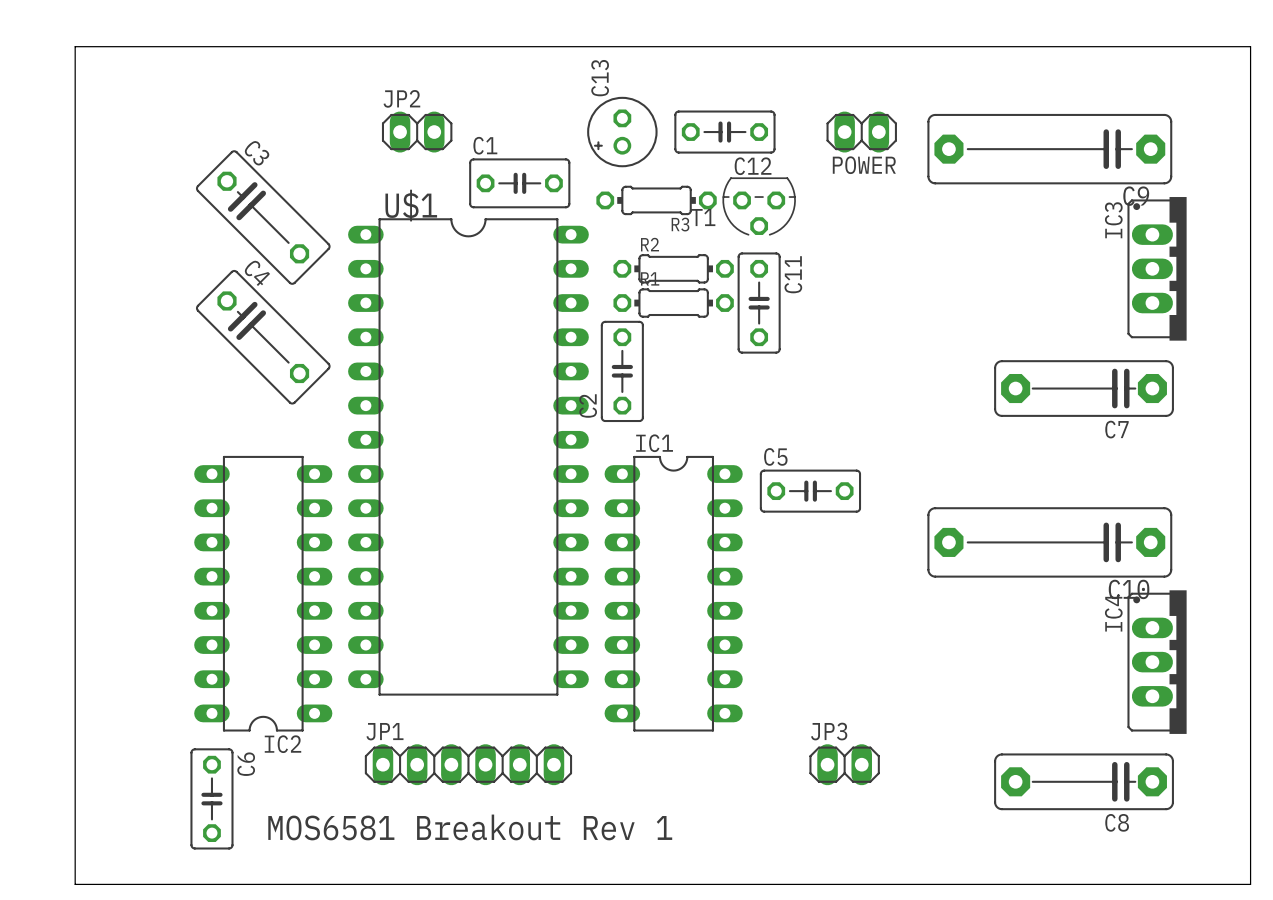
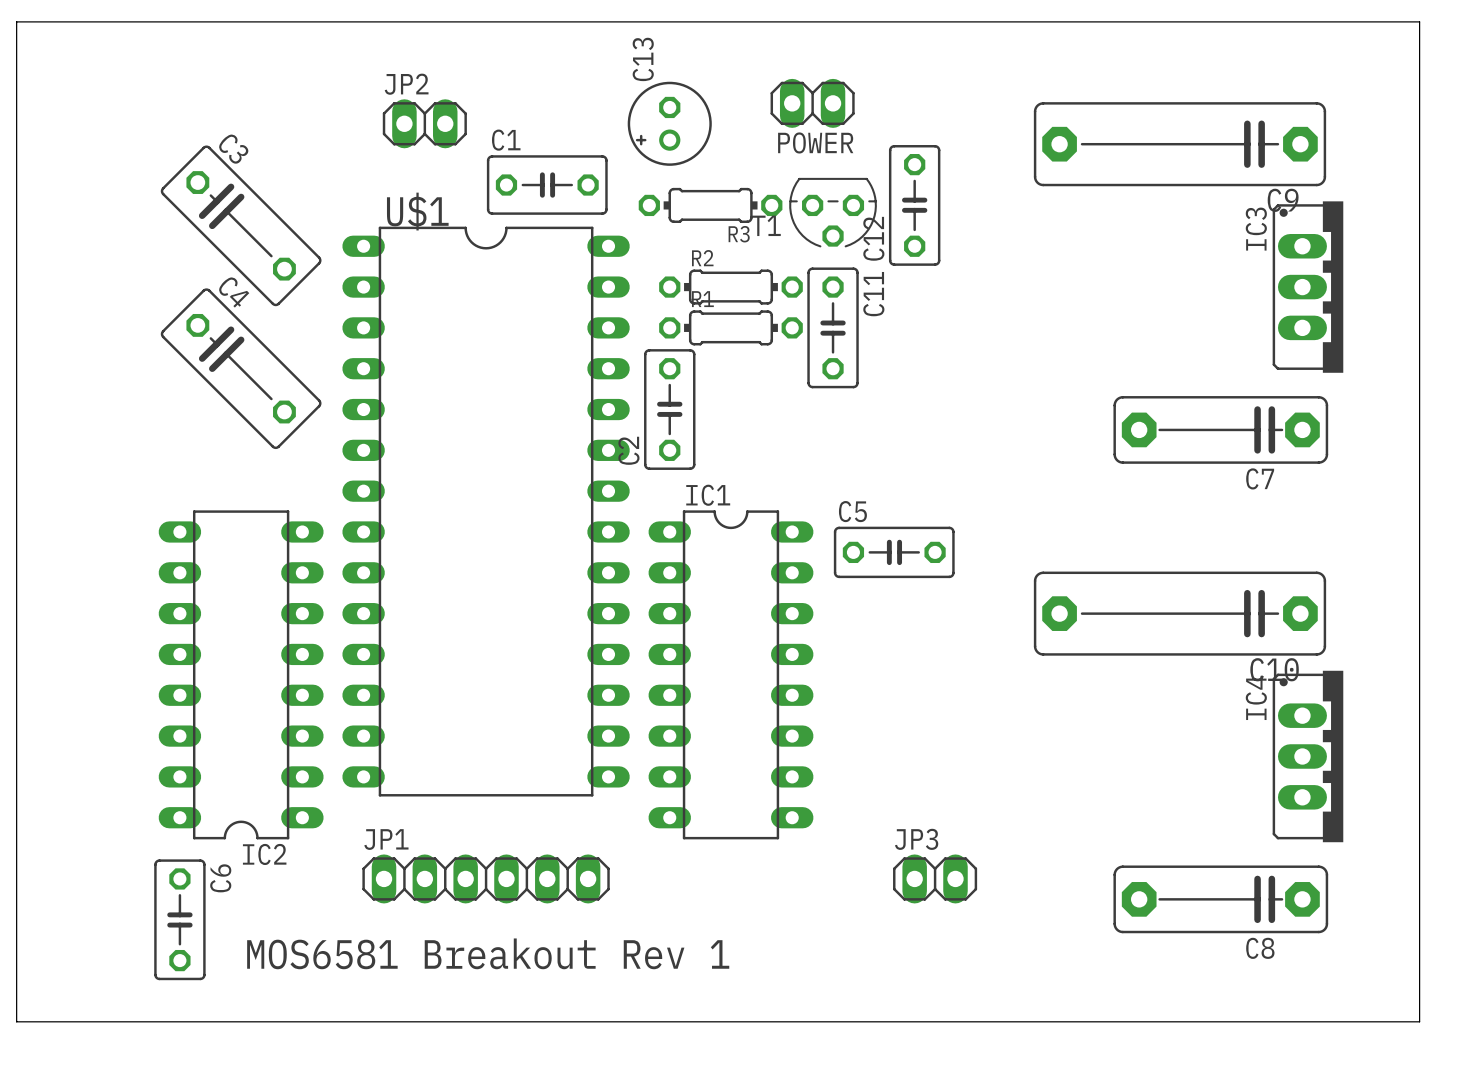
C12 rotation: 0° (724, 132) -> 90° clockwise (914, 205)
C12 position: (724, 132) -> (914, 205)
POWER position: (861, 132) -> (812, 103)

